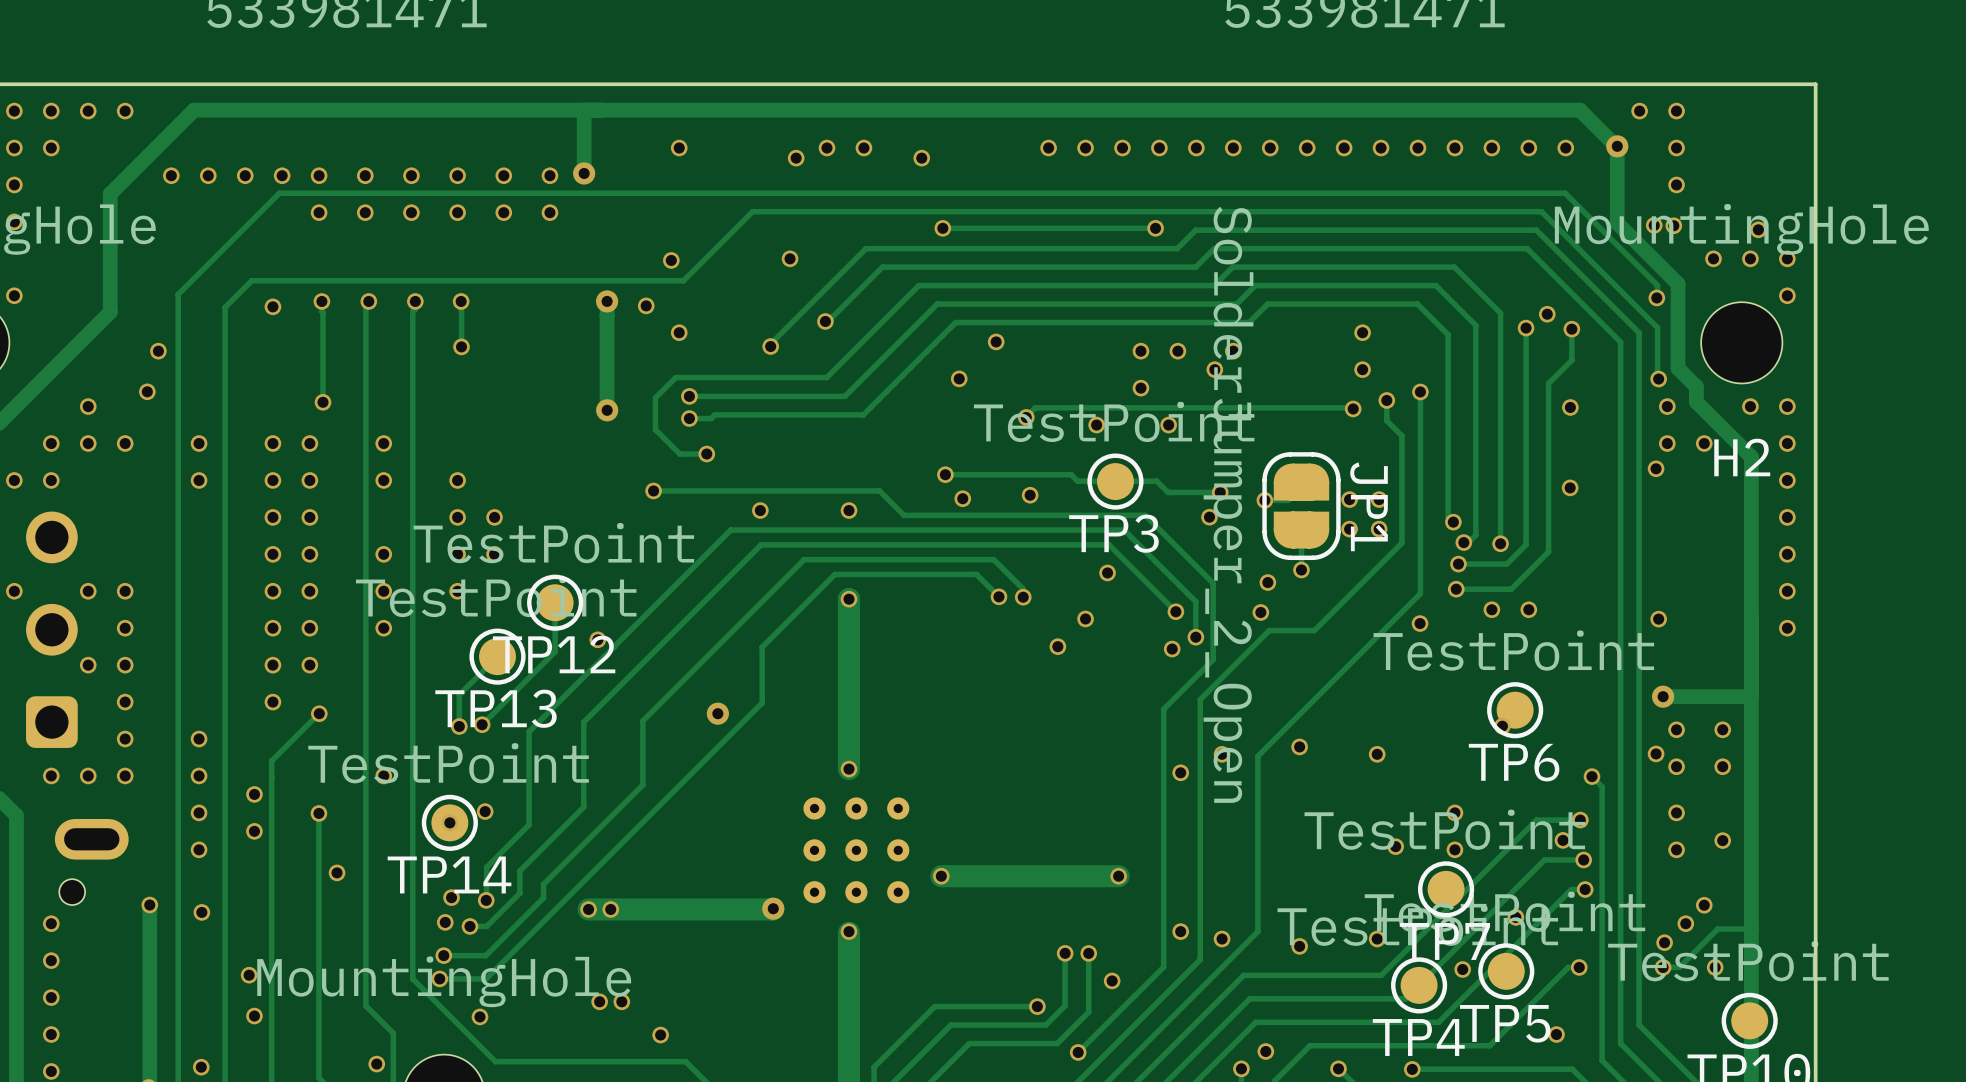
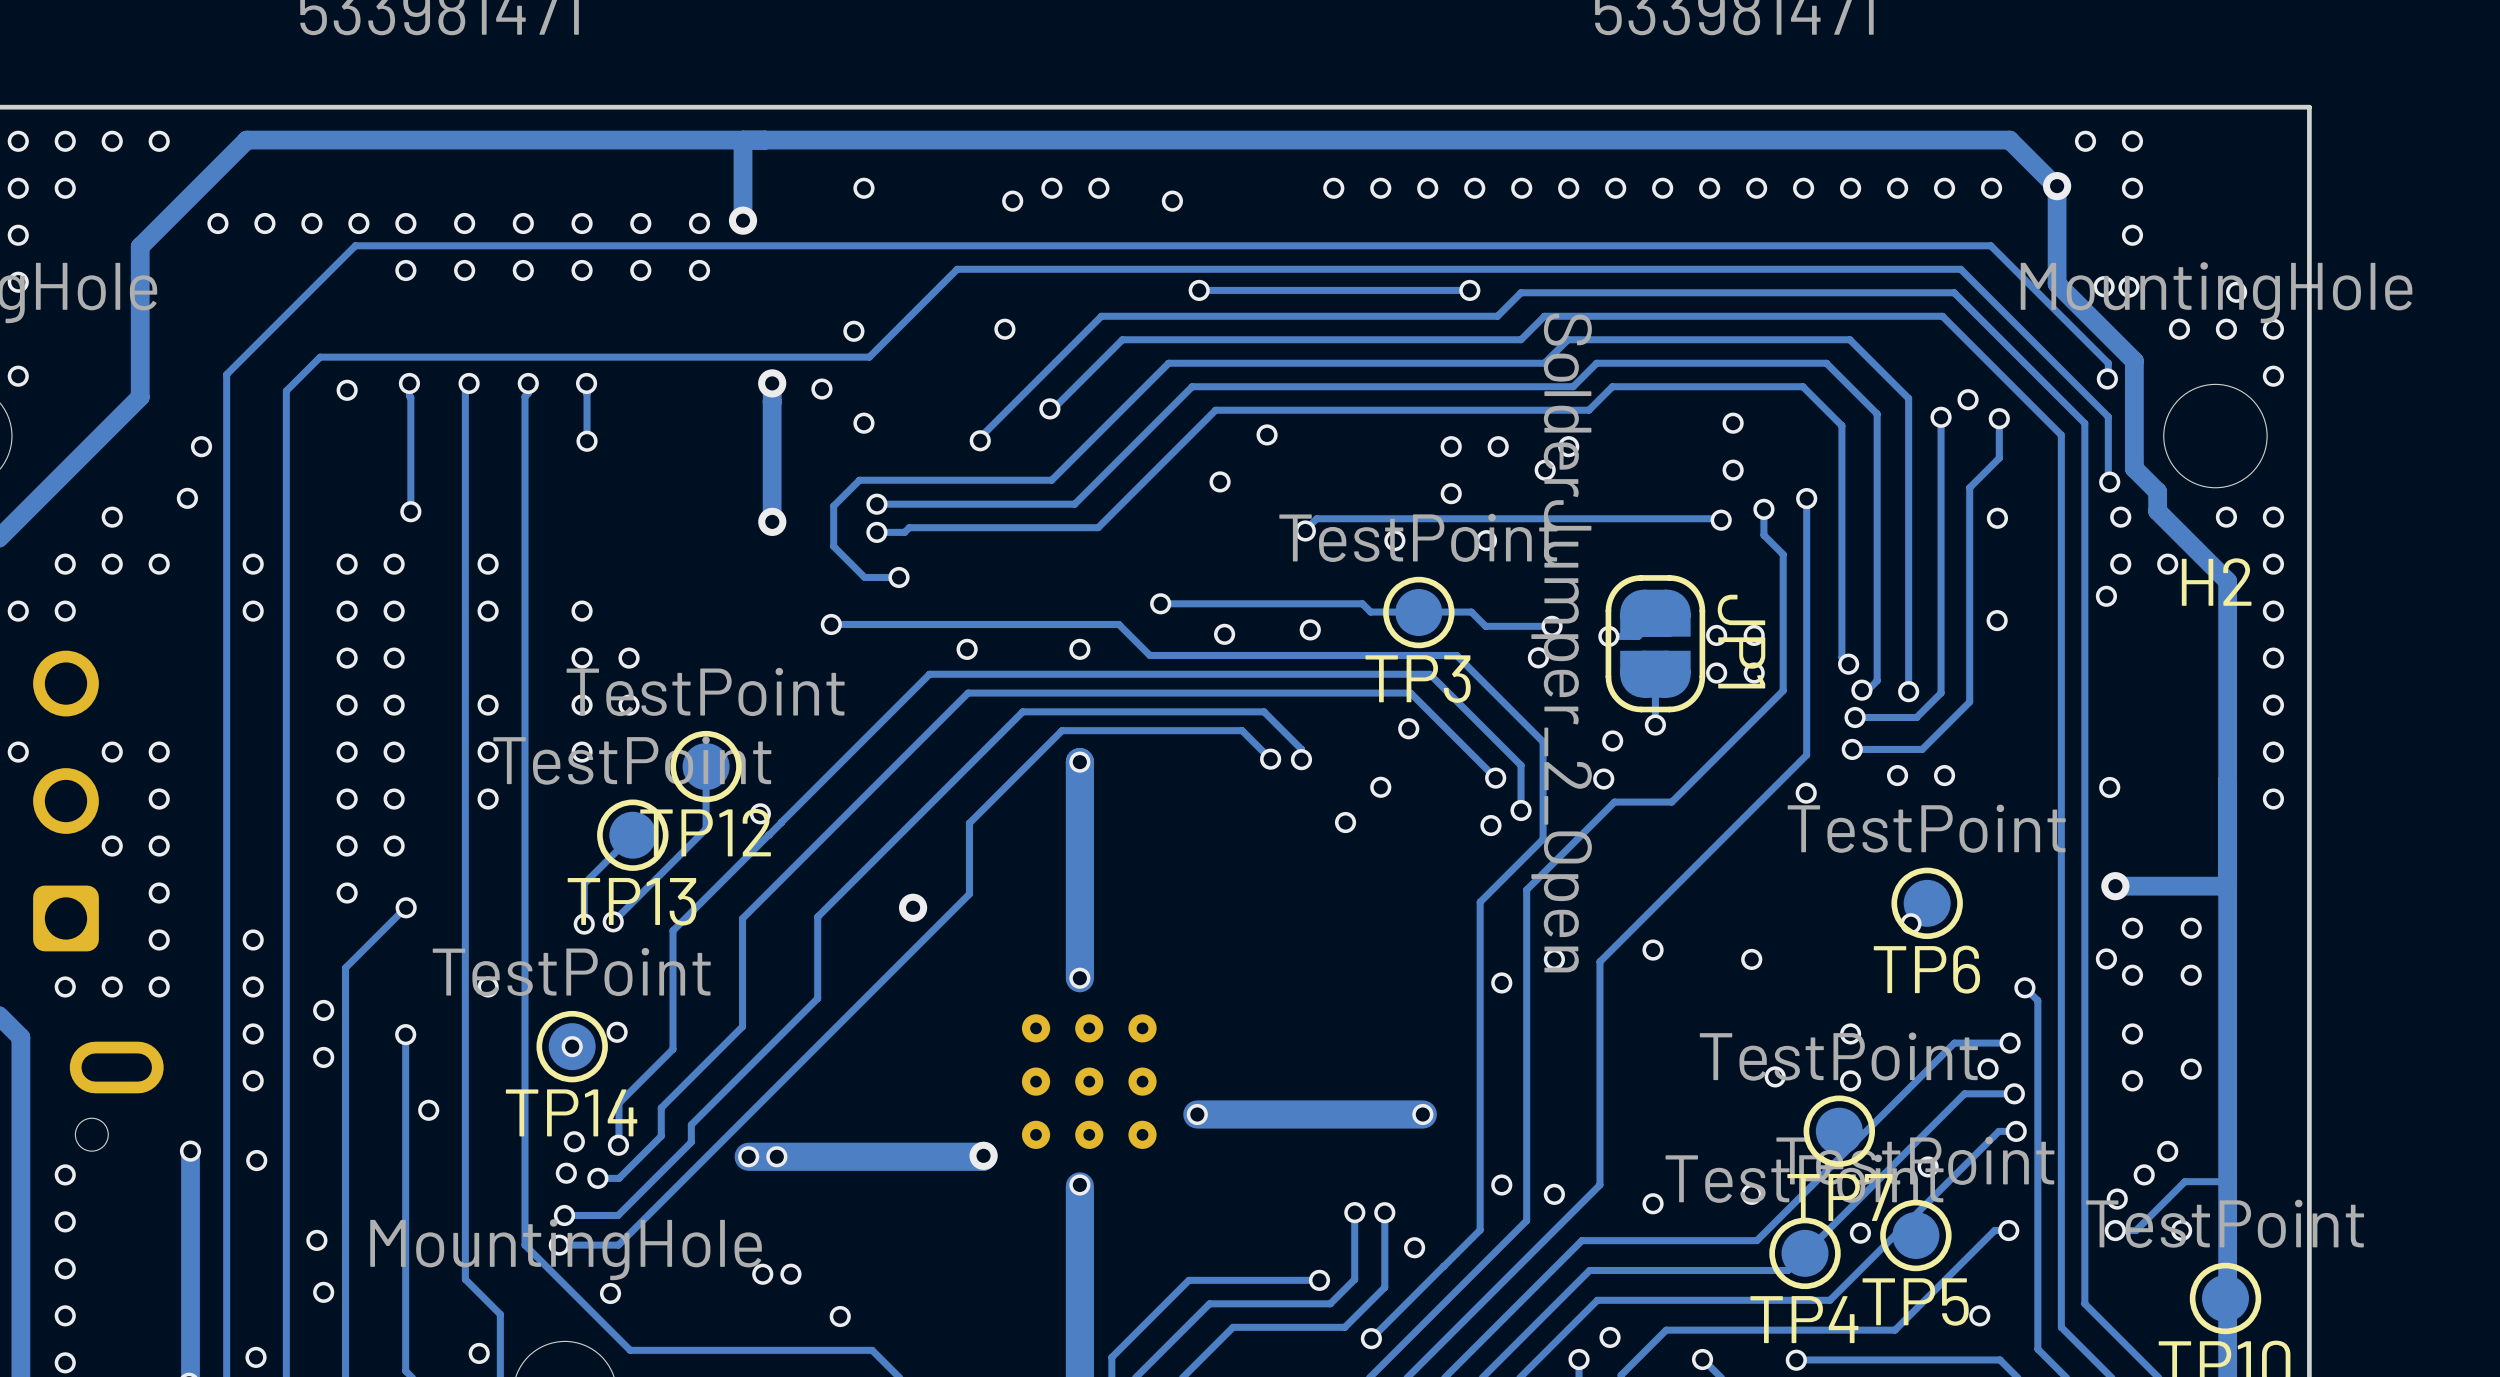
track: none -> (1202, 603) (1160, 603)
via position: (945, 474) -> (1160, 603)

